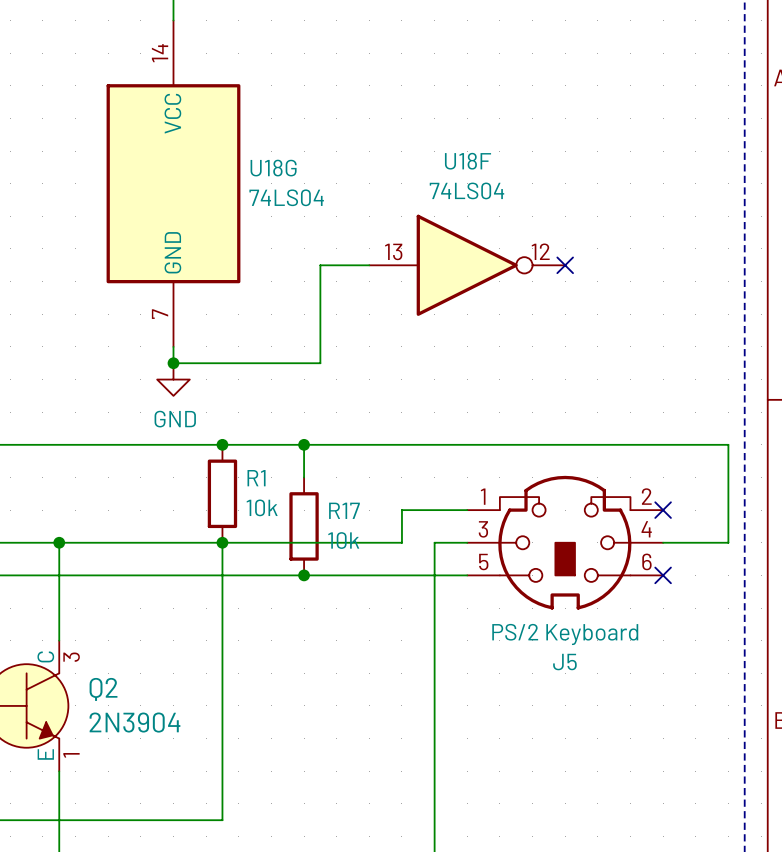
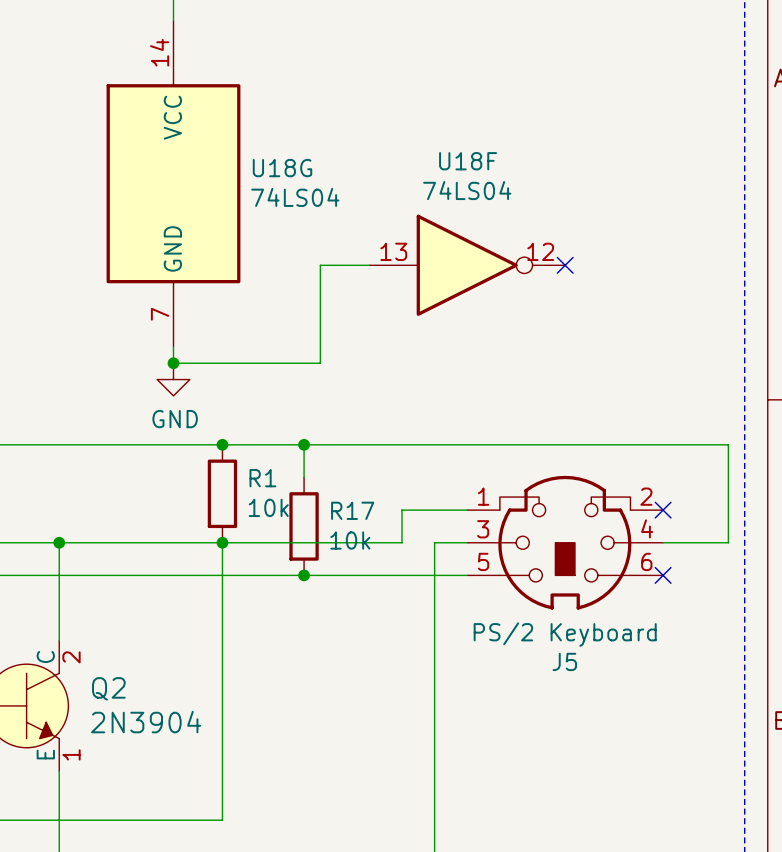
Q2 pin number: 3 (71, 657) -> 2 (71, 657)

